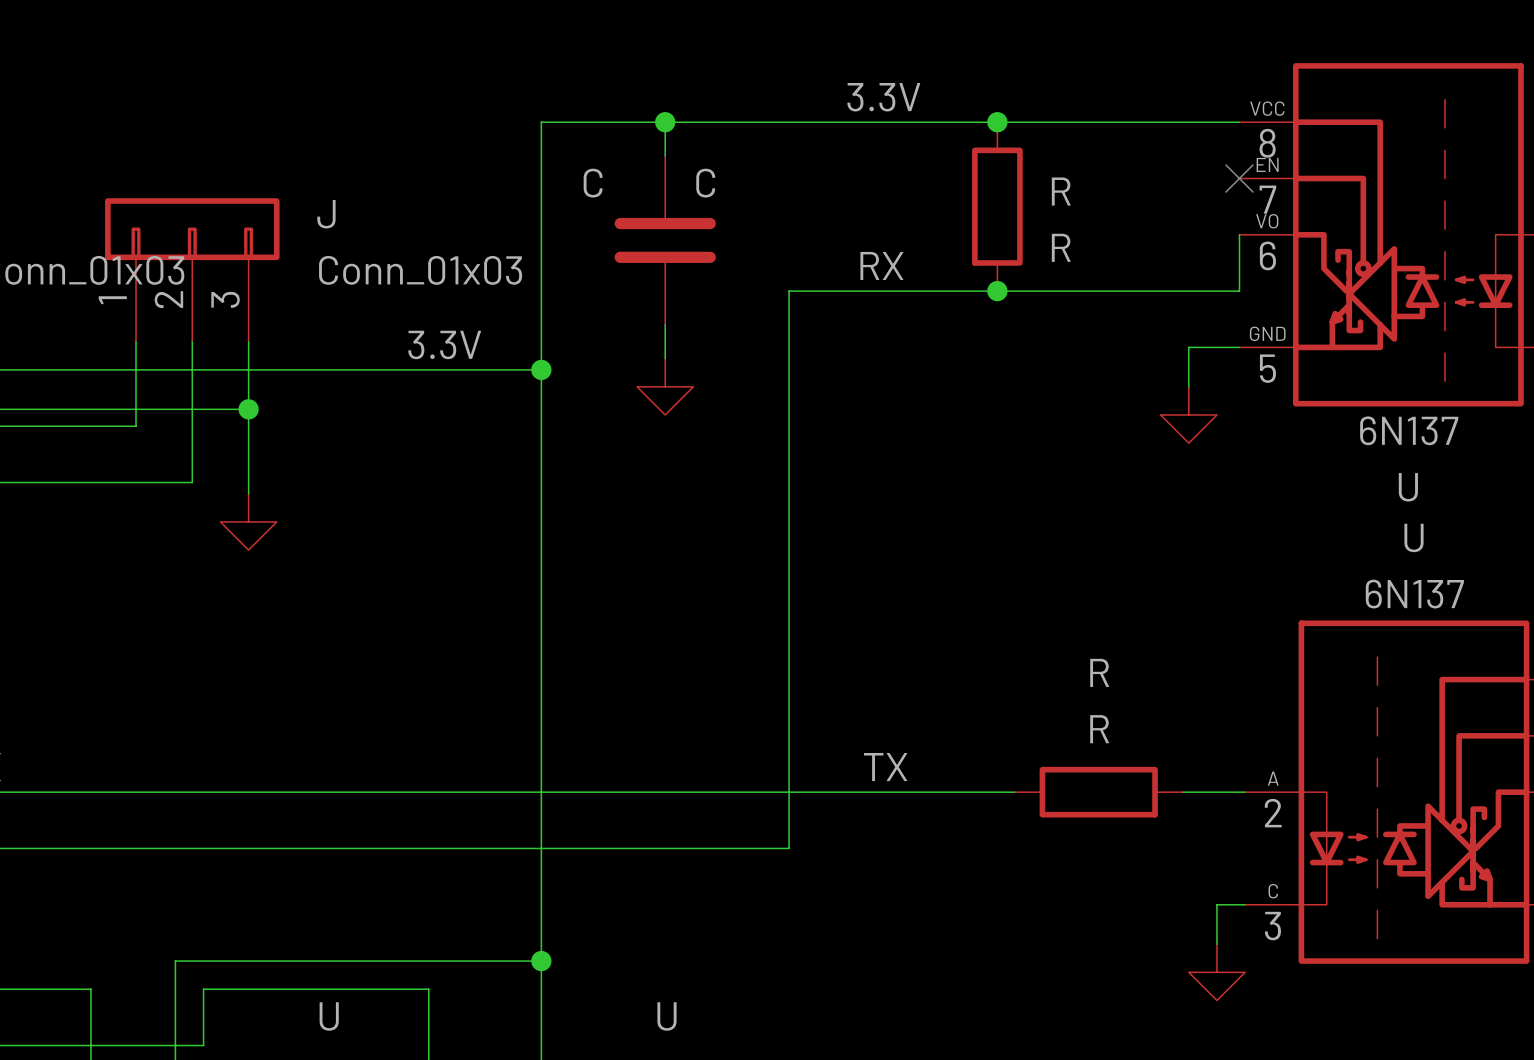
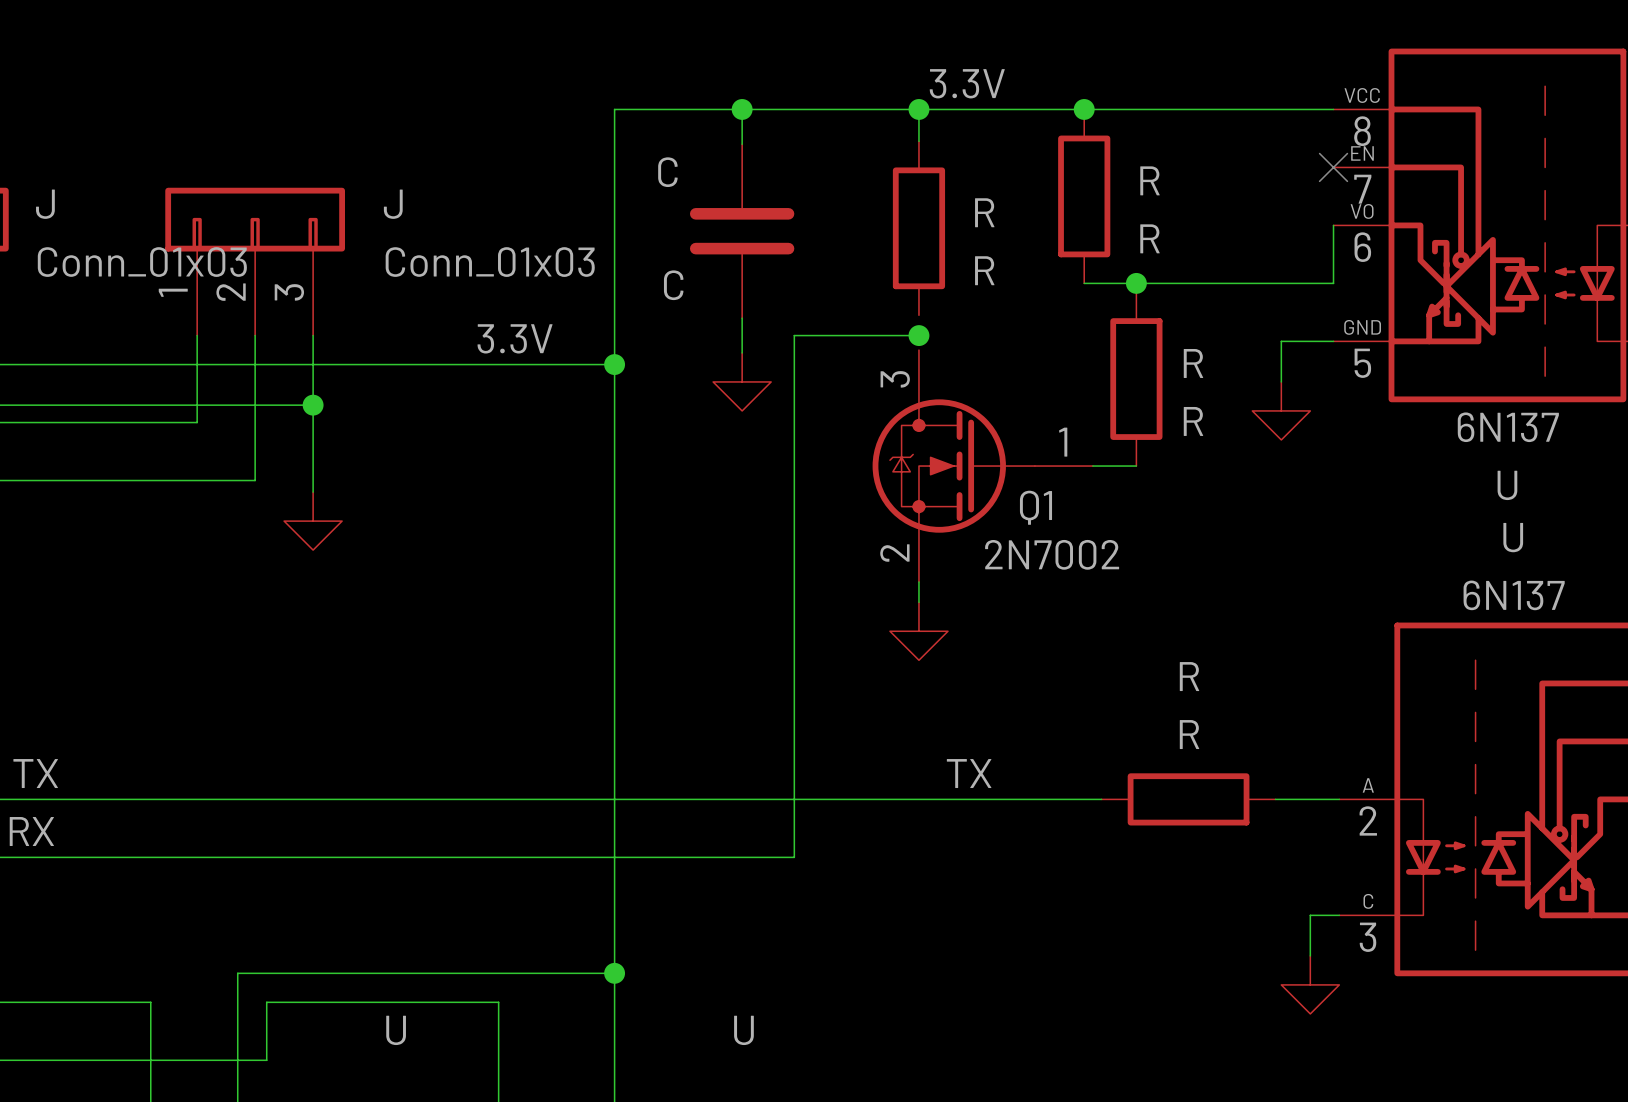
wire: none -> (918, 109) (918, 141)
junction: none -> (918, 109)
C value position: C (705, 183) -> C (673, 285)
R: none -> R (918, 228)
label: RX (881, 265) -> none
wire: (997, 291) (789, 291) (789, 848) (715, 848) -> (918, 335) (794, 335) (794, 857)
junction position: (997, 291) -> (1136, 283)
junction: none -> (918, 335)
R: none -> R (1136, 379)
Q1: none -> 2N7002 (982, 466)
wire: none -> (1092, 466) (1136, 466)
wire: none -> (918, 581) (918, 602)
power symbol: none -> (918, 631)

